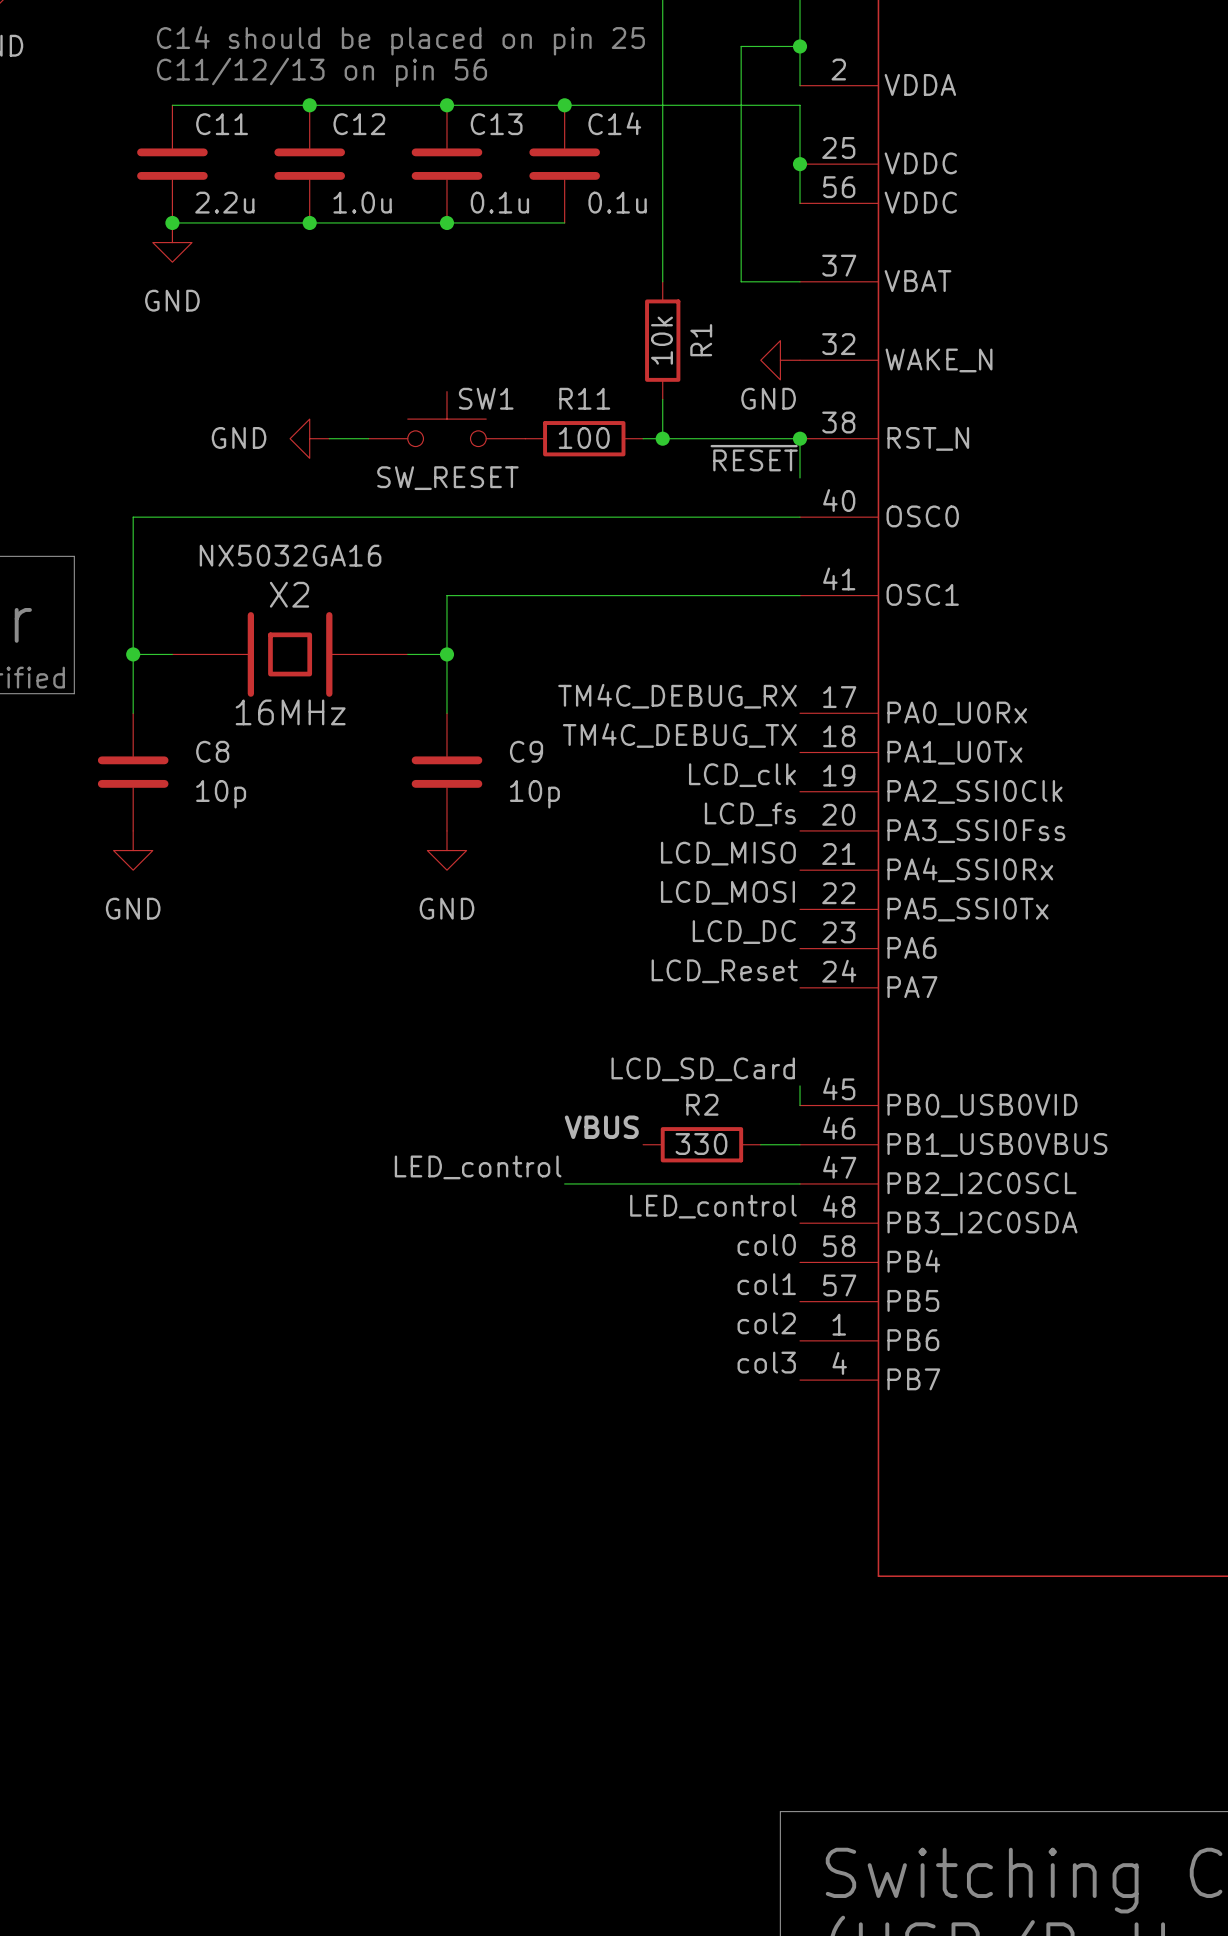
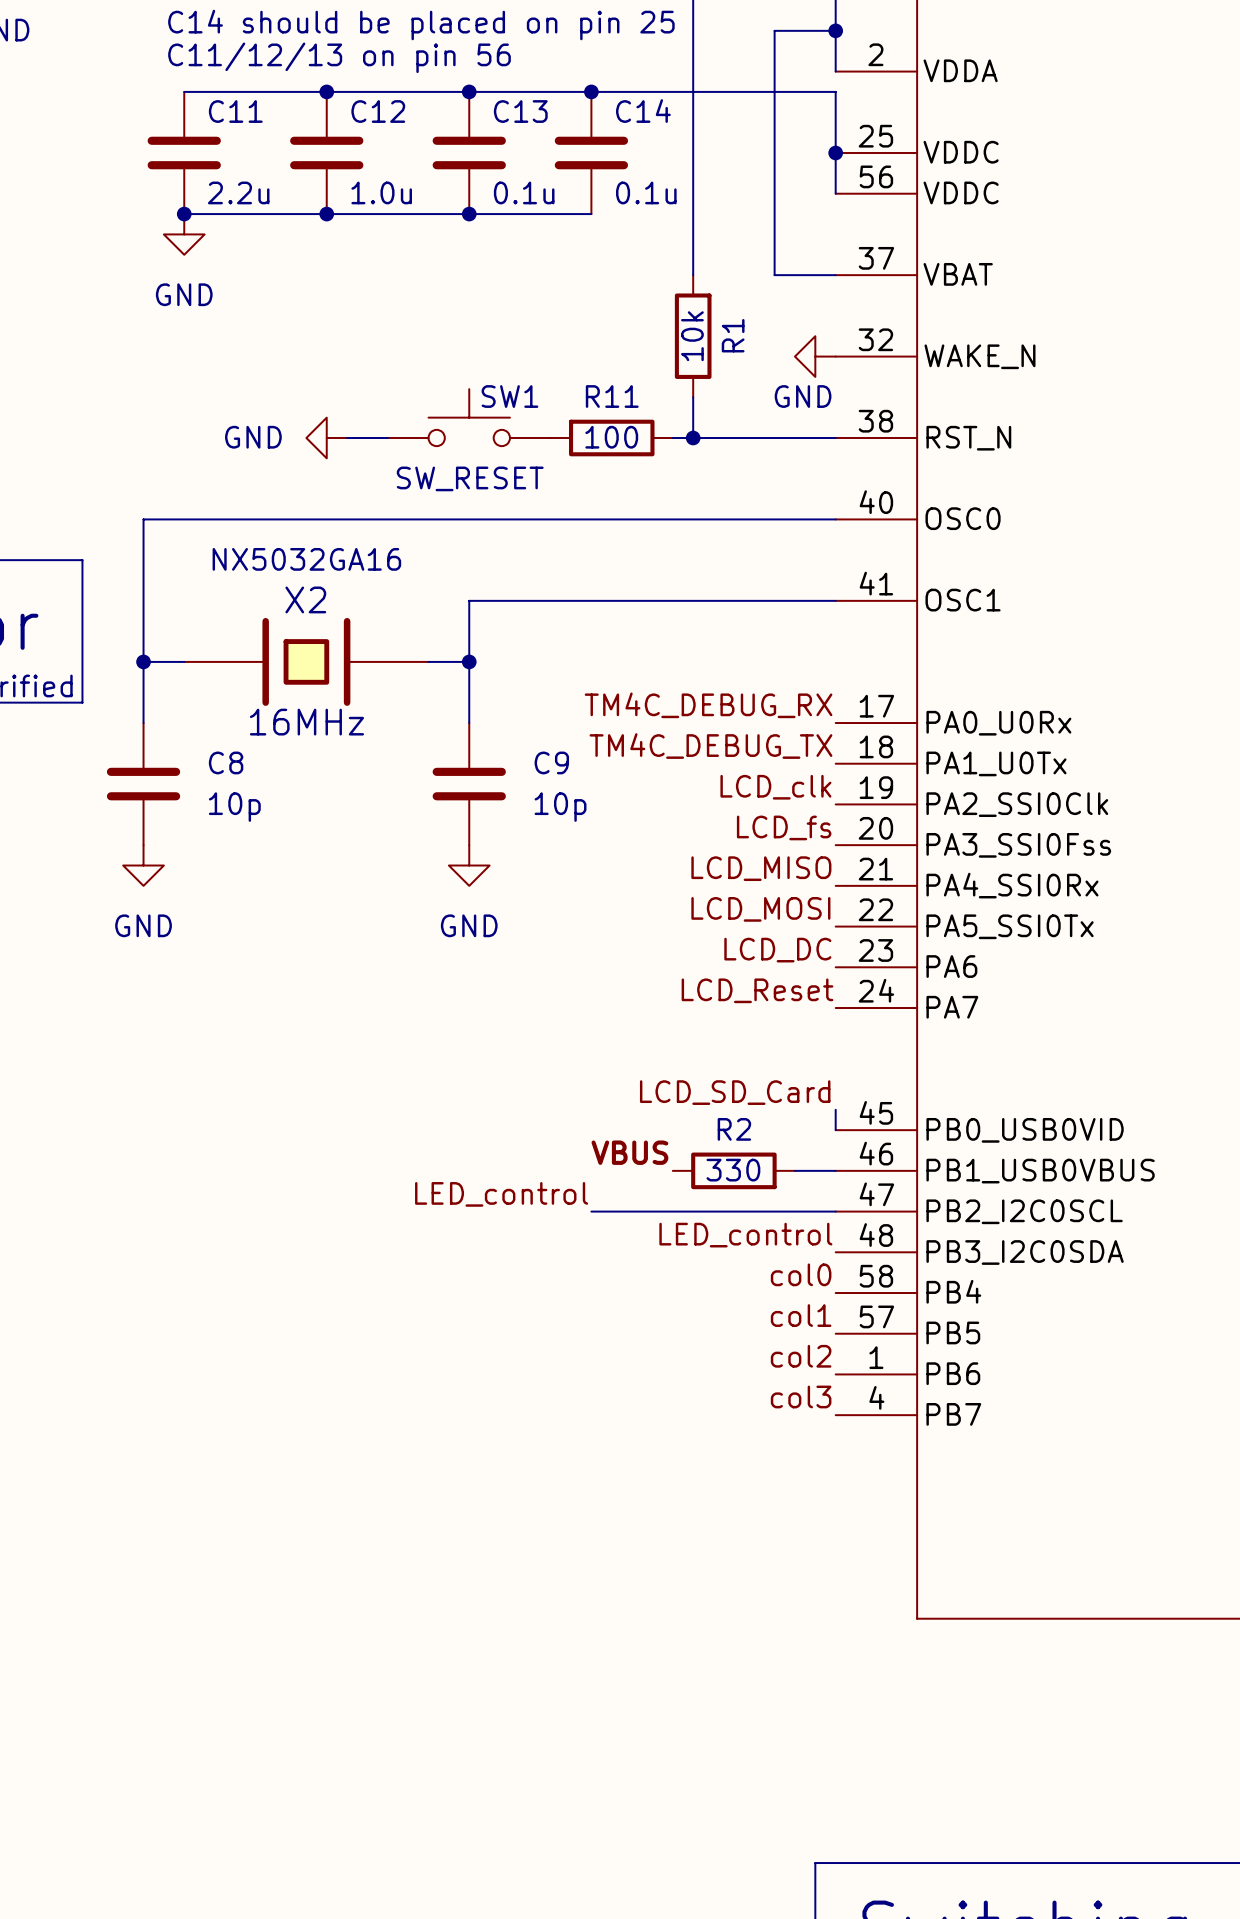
wire: (800, 438) (800, 477) -> none
junction: (800, 438) -> none
label: ~{RESET} (754, 458) -> none

